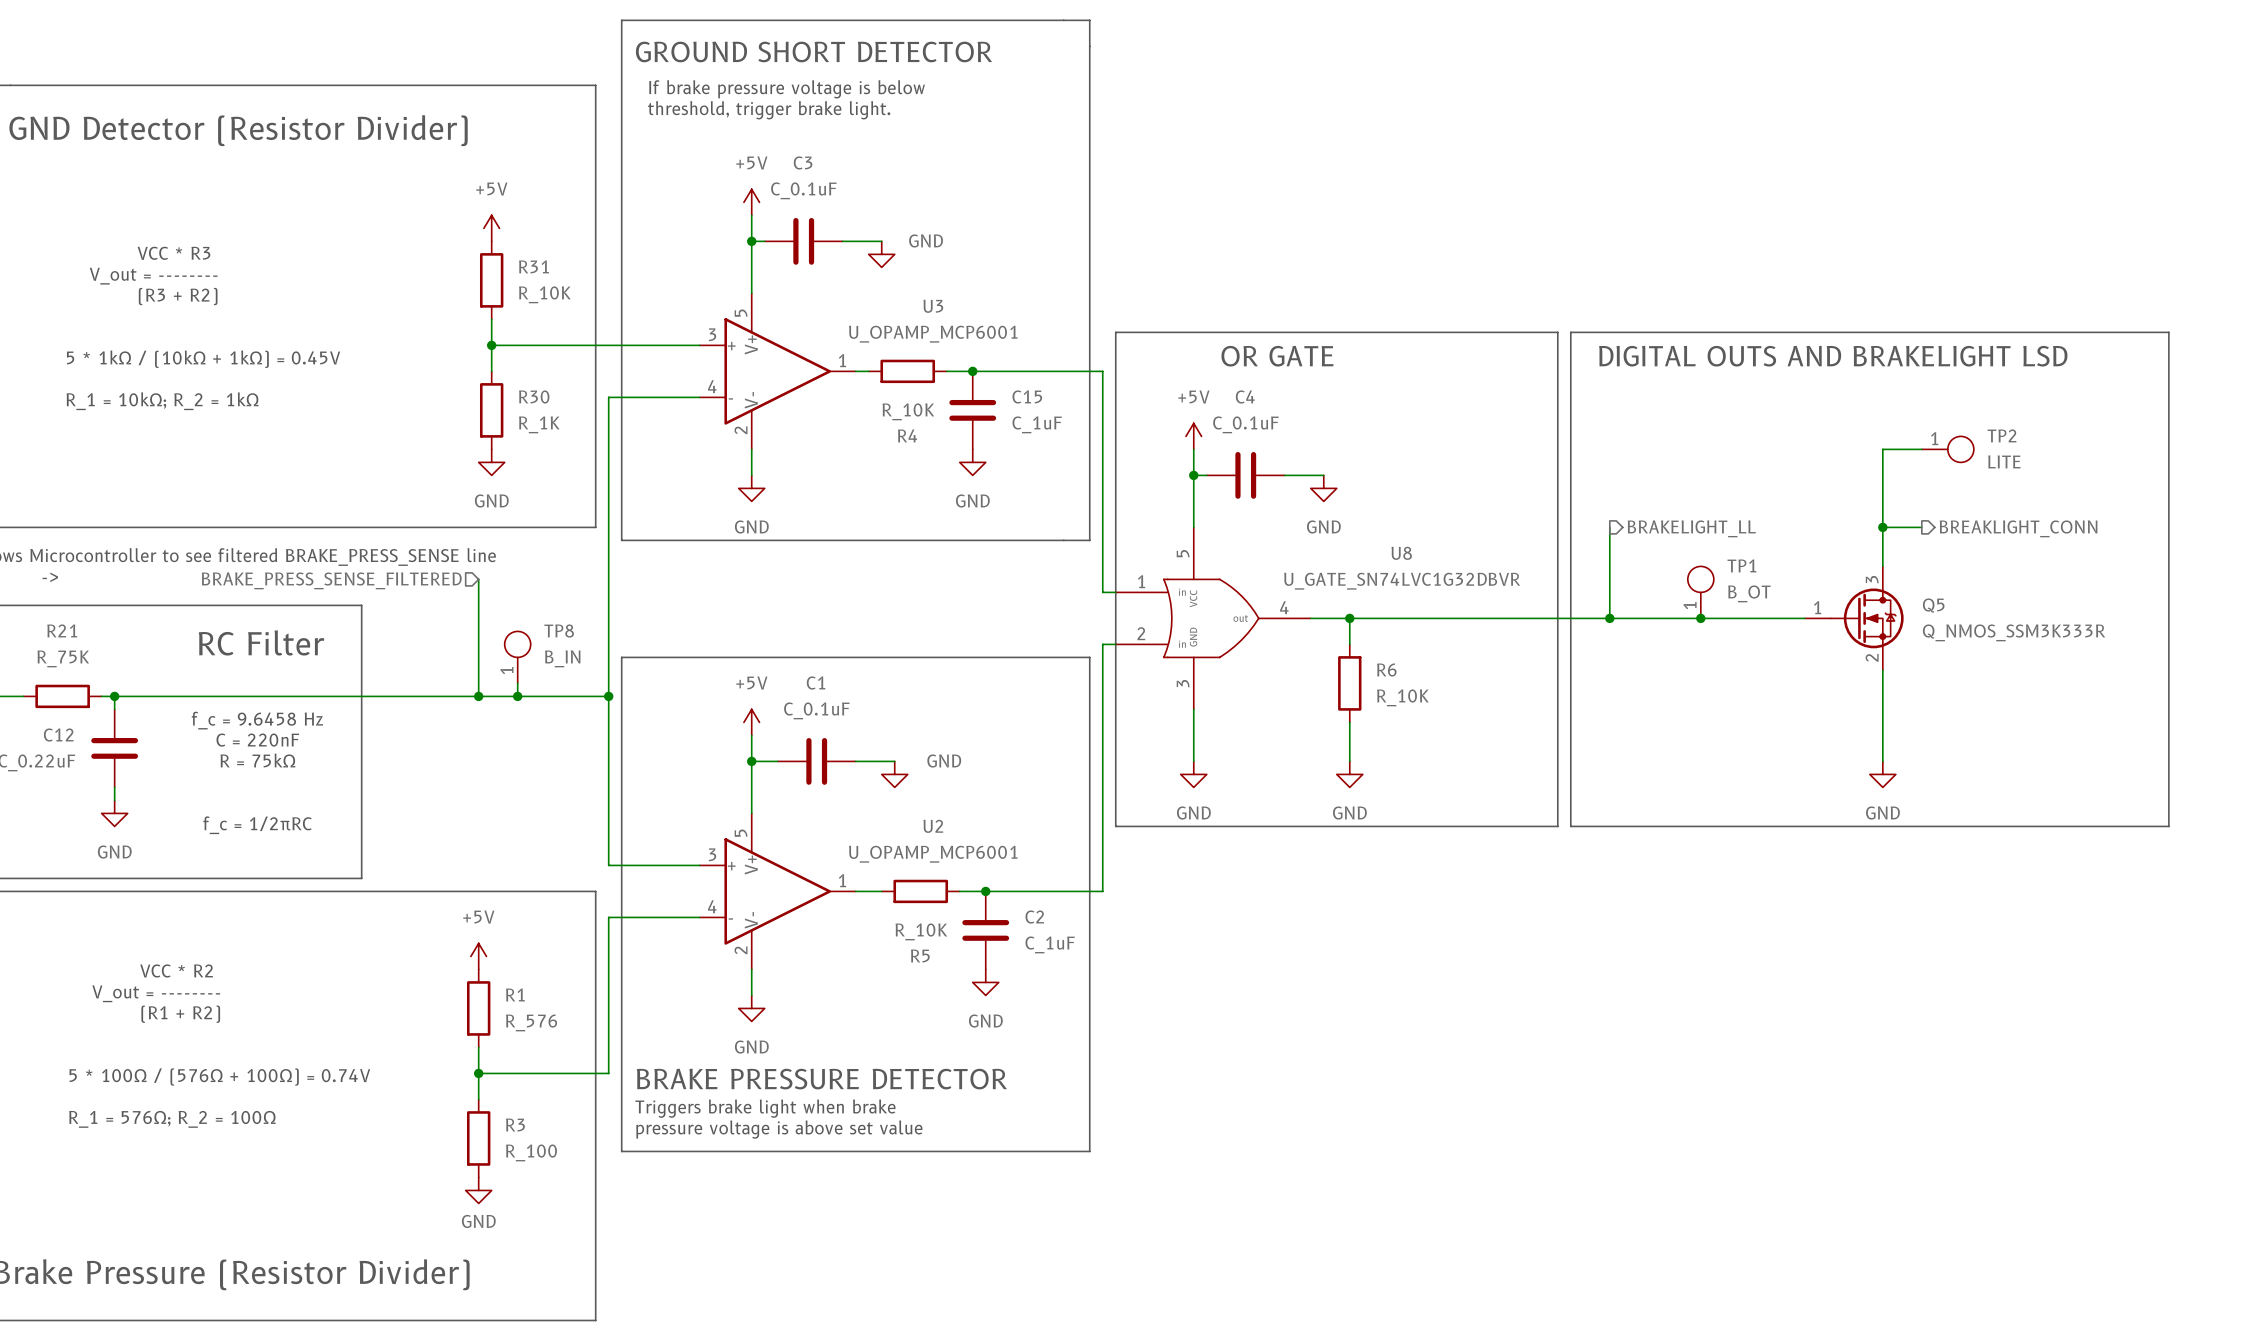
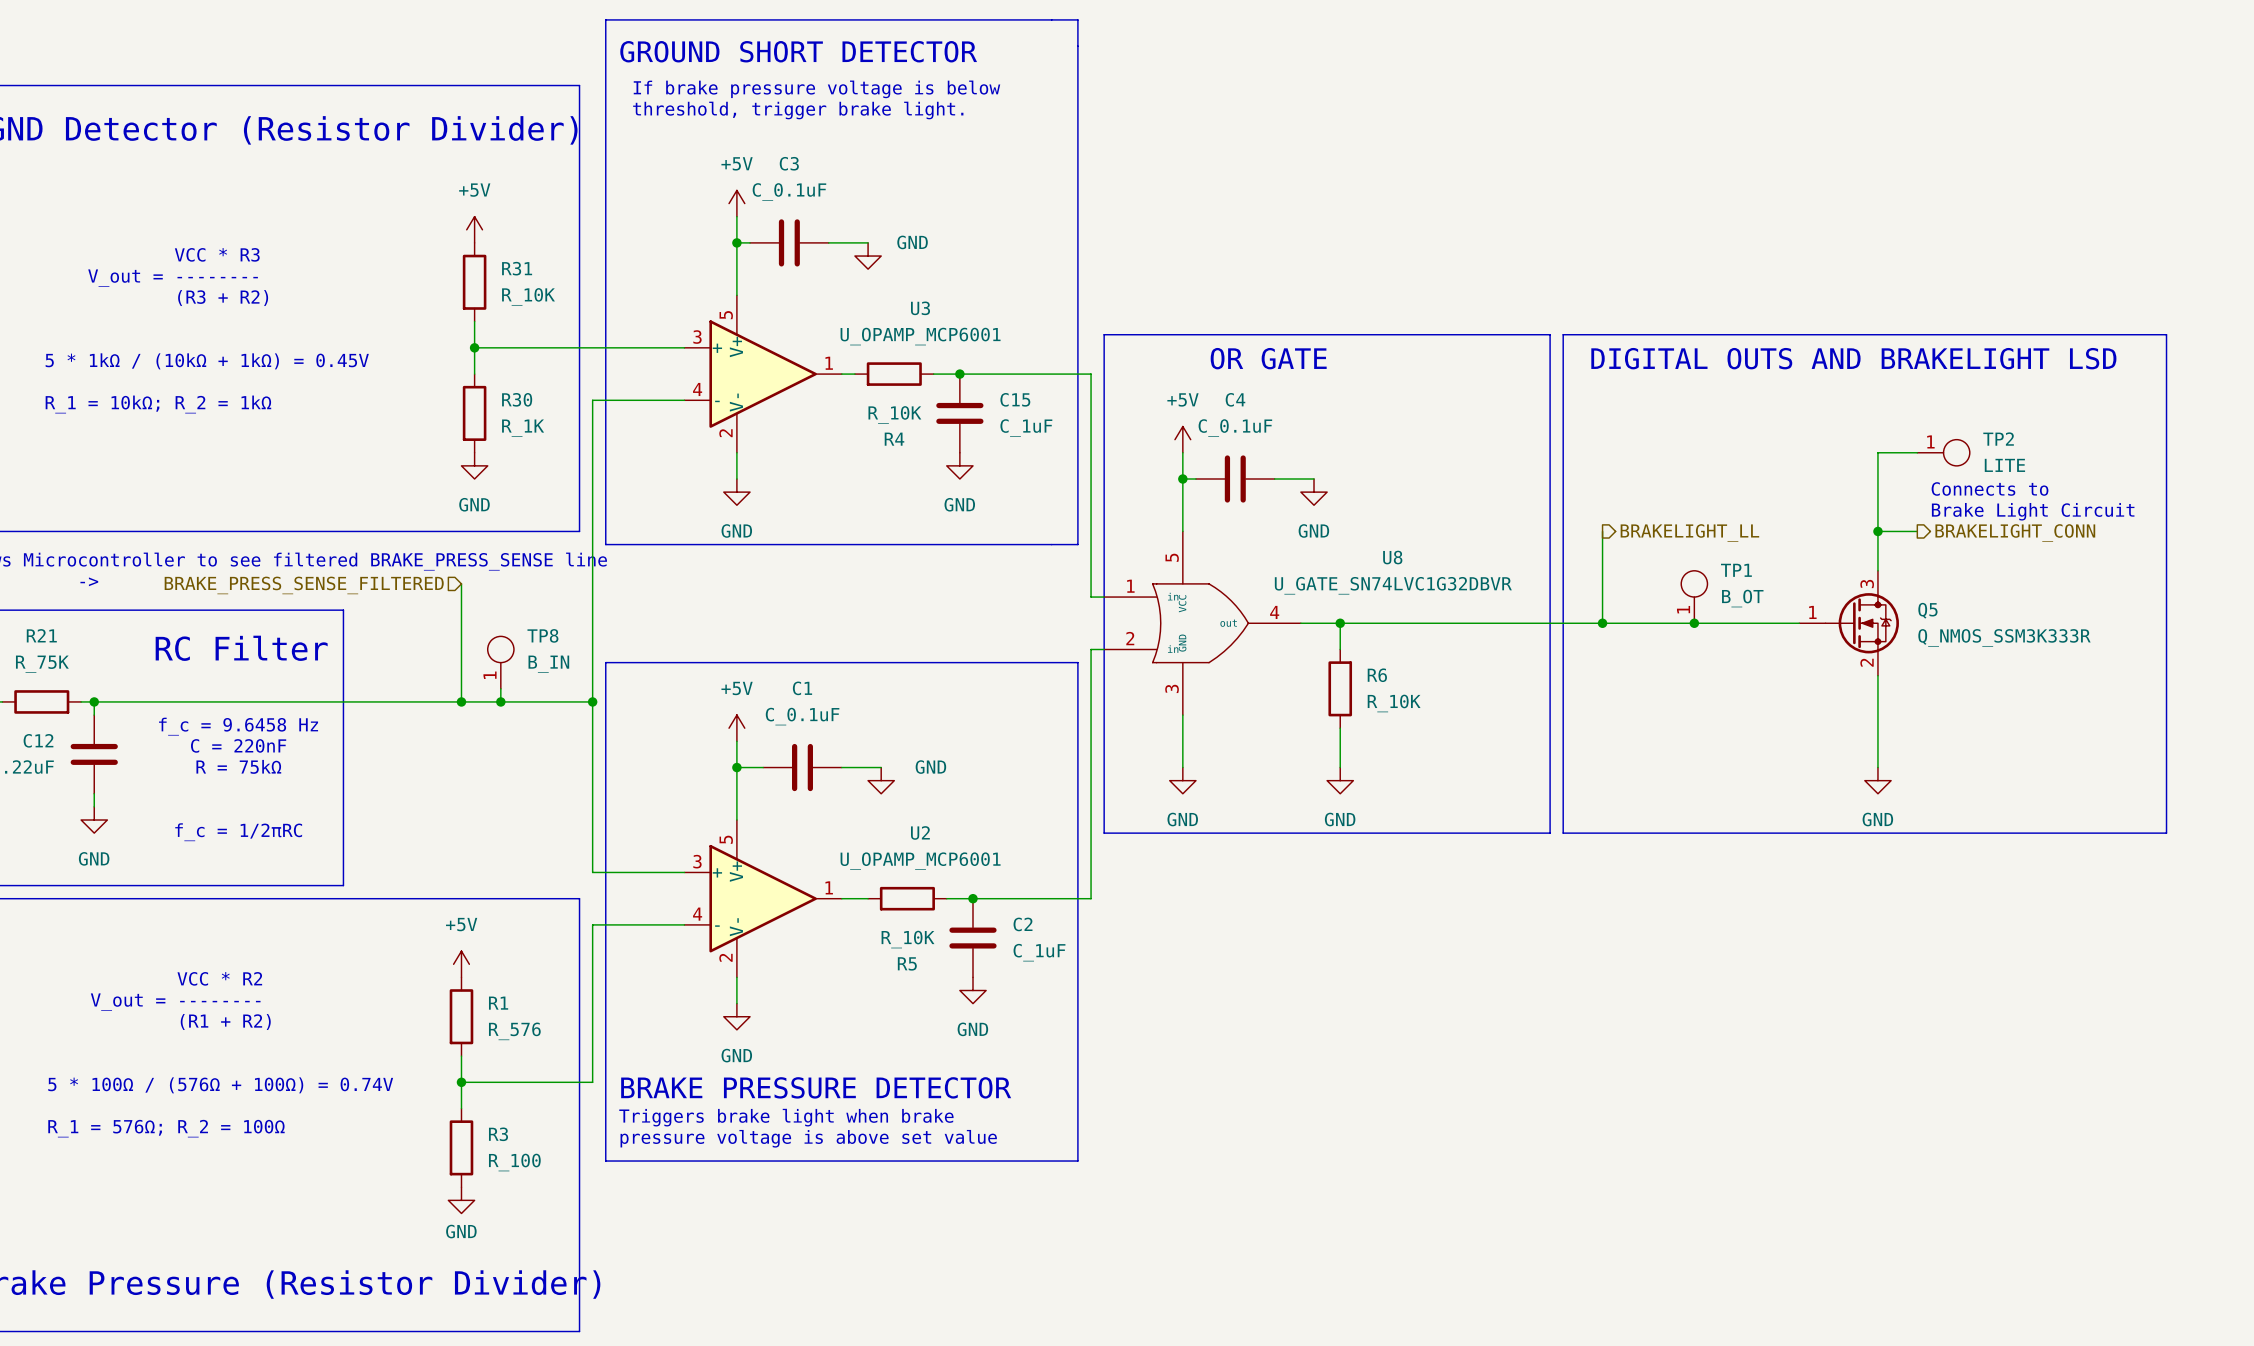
text: none -> Connects to (1990, 488)
text: none -> Brake Light Circuit (2033, 511)
hierarchical label: BREAKLIGHT_CONN (2018, 528) -> BRAKELIGHT_CONN (2015, 532)

